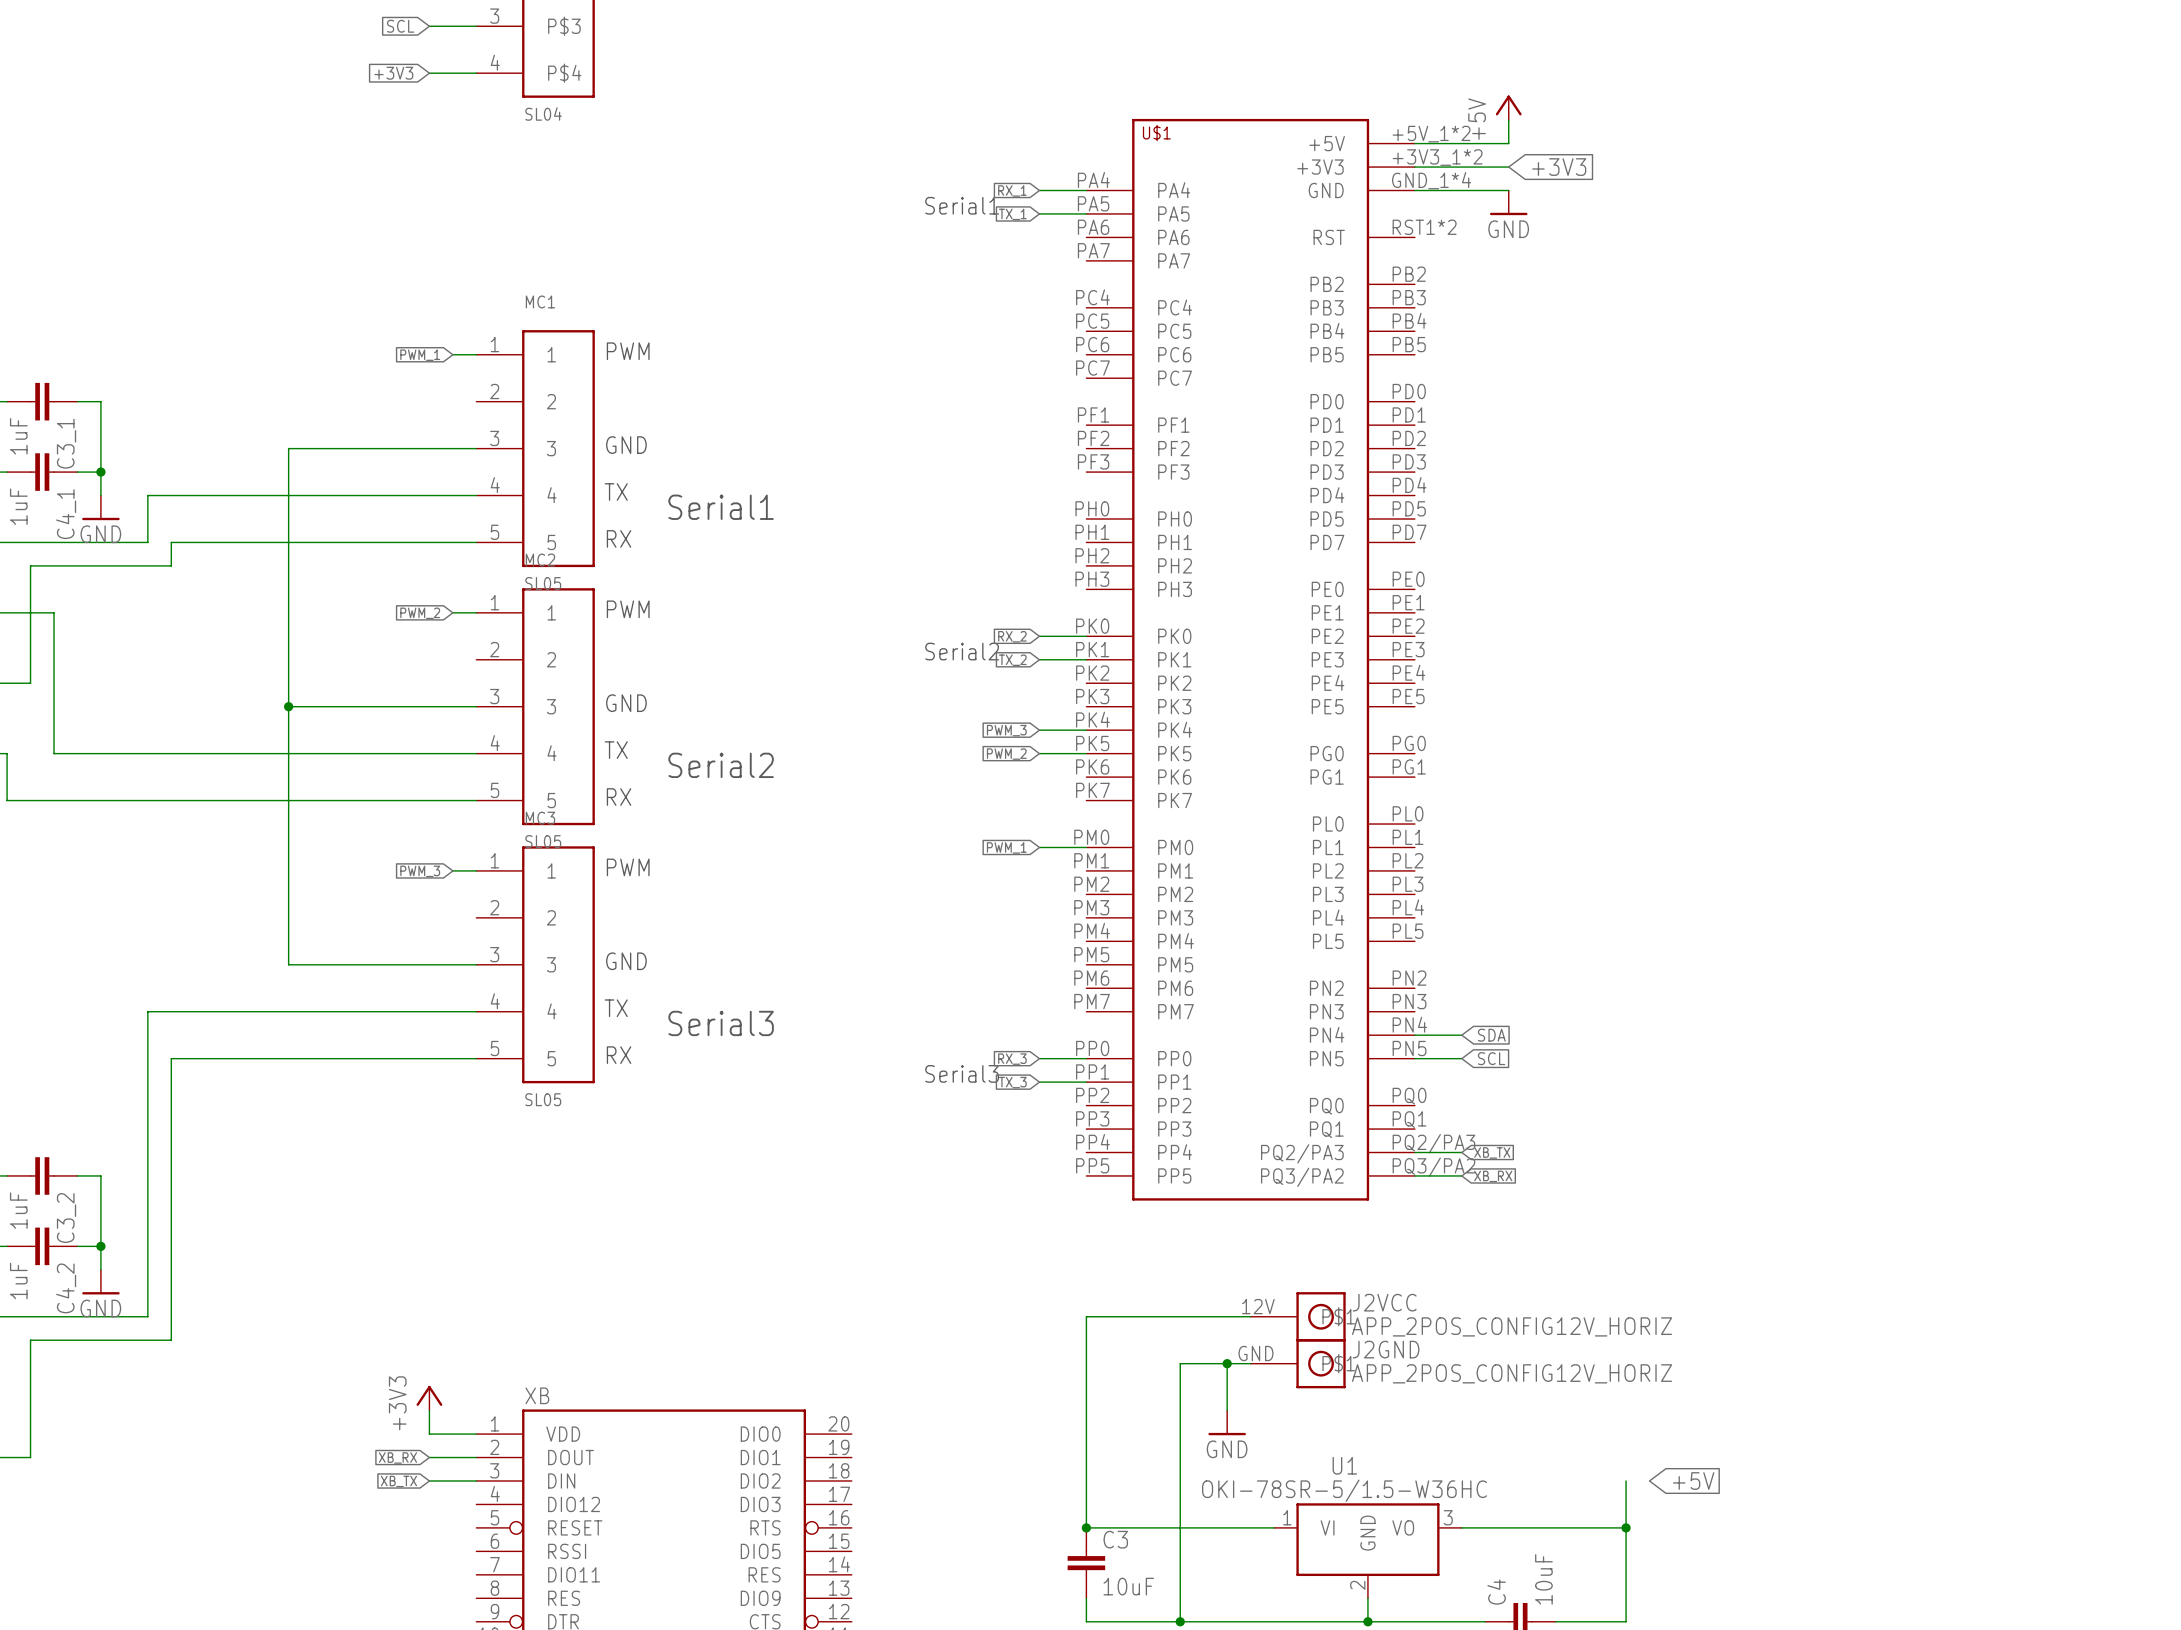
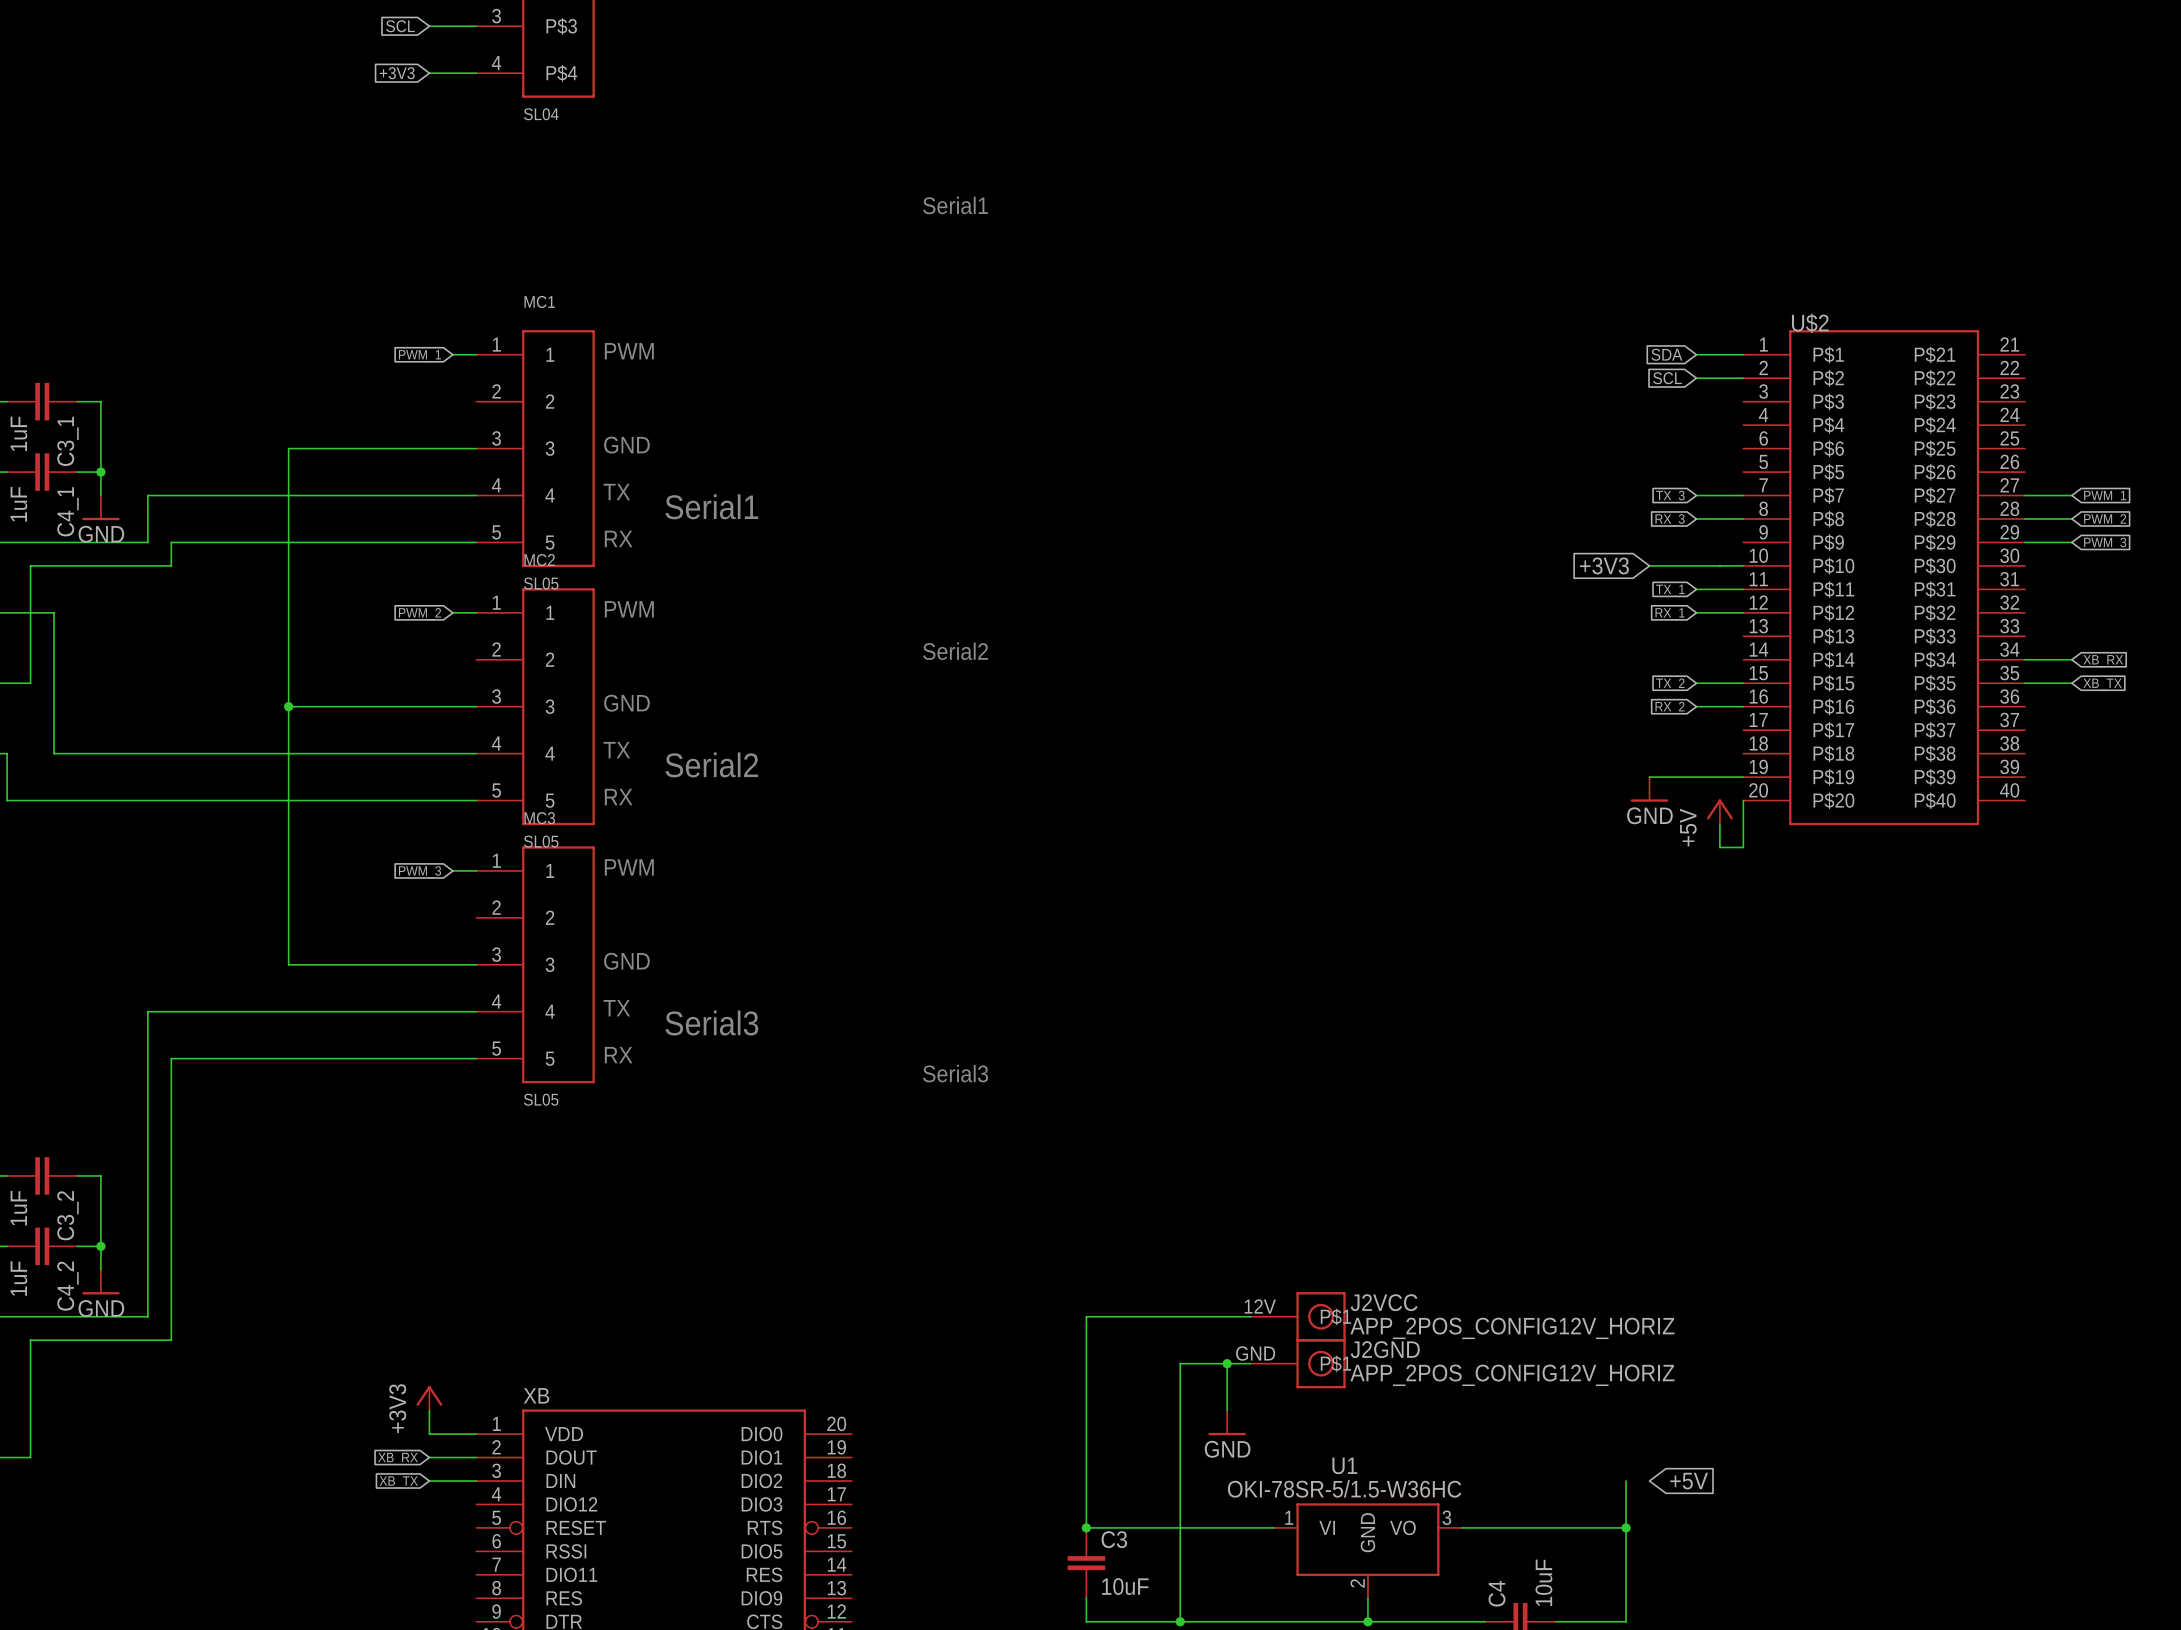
power symbol: +5V (1508, 107) -> none
wire: (1508, 120) (1508, 143) (1414, 143) -> none
wire: (1414, 167) (1508, 167) -> none
global label: +3V3 (1559, 167) -> none
global label: RX_1 (1012, 190) -> none
wire: (1039, 190) (1086, 190) -> none
wire: (1414, 190) (1508, 190) -> none
power symbol: GND (1508, 202) -> none
wire: (1039, 213) (1086, 213) -> none
global label: TX_1 (1012, 214) -> none
global label: none -> SDA (1666, 354)
wire: none -> (1696, 354) (1743, 354)
global label: none -> SCL (1667, 378)
wire: none -> (1696, 378) (1743, 378)
global label: none -> TX_3 (1670, 496)
wire: none -> (1696, 495) (1743, 495)
wire: none -> (2024, 495) (2071, 495)
global label: none -> PWM_1 (2105, 496)
wire: none -> (1696, 518) (1743, 518)
wire: none -> (2024, 518) (2071, 518)
global label: none -> RX_3 (1670, 520)
global label: none -> PWM_2 (2105, 520)
wire: none -> (2024, 542) (2071, 542)
global label: none -> PWM_3 (2105, 543)
global label: none -> +3V3 (1604, 565)
wire: none -> (1649, 565) (1743, 565)
U$2: none -> (1884, 577)
global label: none -> TX_1 (1670, 590)
wire: none -> (1696, 589) (1743, 589)
wire: none -> (1696, 612) (1743, 612)
global label: none -> RX_1 (1670, 614)
global label: RX_2 (1012, 636) -> none
wire: (1039, 636) (1086, 636) -> none
wire: (1039, 659) (1086, 659) -> none
U$1: (1250, 659) -> none
wire: none -> (2024, 659) (2071, 659)
global label: TX_2 (1012, 660) -> none
global label: none -> XB_RX (2103, 661)
global label: none -> TX_2 (1670, 684)
wire: none -> (1696, 683) (1743, 683)
wire: none -> (2024, 683) (2071, 683)
global label: none -> XB_TX (2102, 684)
wire: none -> (1696, 706) (1743, 706)
global label: none -> RX_2 (1670, 707)
global label: PWM_3 (1006, 730) -> none
wire: (1039, 730) (1086, 730) -> none
wire: (1039, 753) (1086, 753) -> none
global label: PWM_2 (1006, 754) -> none
wire: none -> (1649, 777) (1743, 777)
power symbol: none -> GND (1649, 789)
wire: none -> (1743, 800) (1743, 847) (1719, 847) (1719, 824)
power symbol: none -> +5V (1719, 811)
global label: PWM_1 (1006, 847) -> none
wire: (1039, 847) (1086, 847) -> none
wire: (1414, 1035) (1461, 1035) -> none
global label: SDA (1491, 1035) -> none
wire: (1039, 1058) (1086, 1058) -> none
wire: (1414, 1058) (1461, 1058) -> none
global label: SCL (1491, 1058) -> none
global label: RX_3 (1012, 1059) -> none
global label: TX_3 (1012, 1082) -> none
wire: (1039, 1082) (1086, 1082) -> none
wire: (1414, 1152) (1461, 1152) -> none
global label: XB_TX (1492, 1152) -> none
wire: (1414, 1175) (1461, 1175) -> none
global label: XB_RX (1493, 1176) -> none

